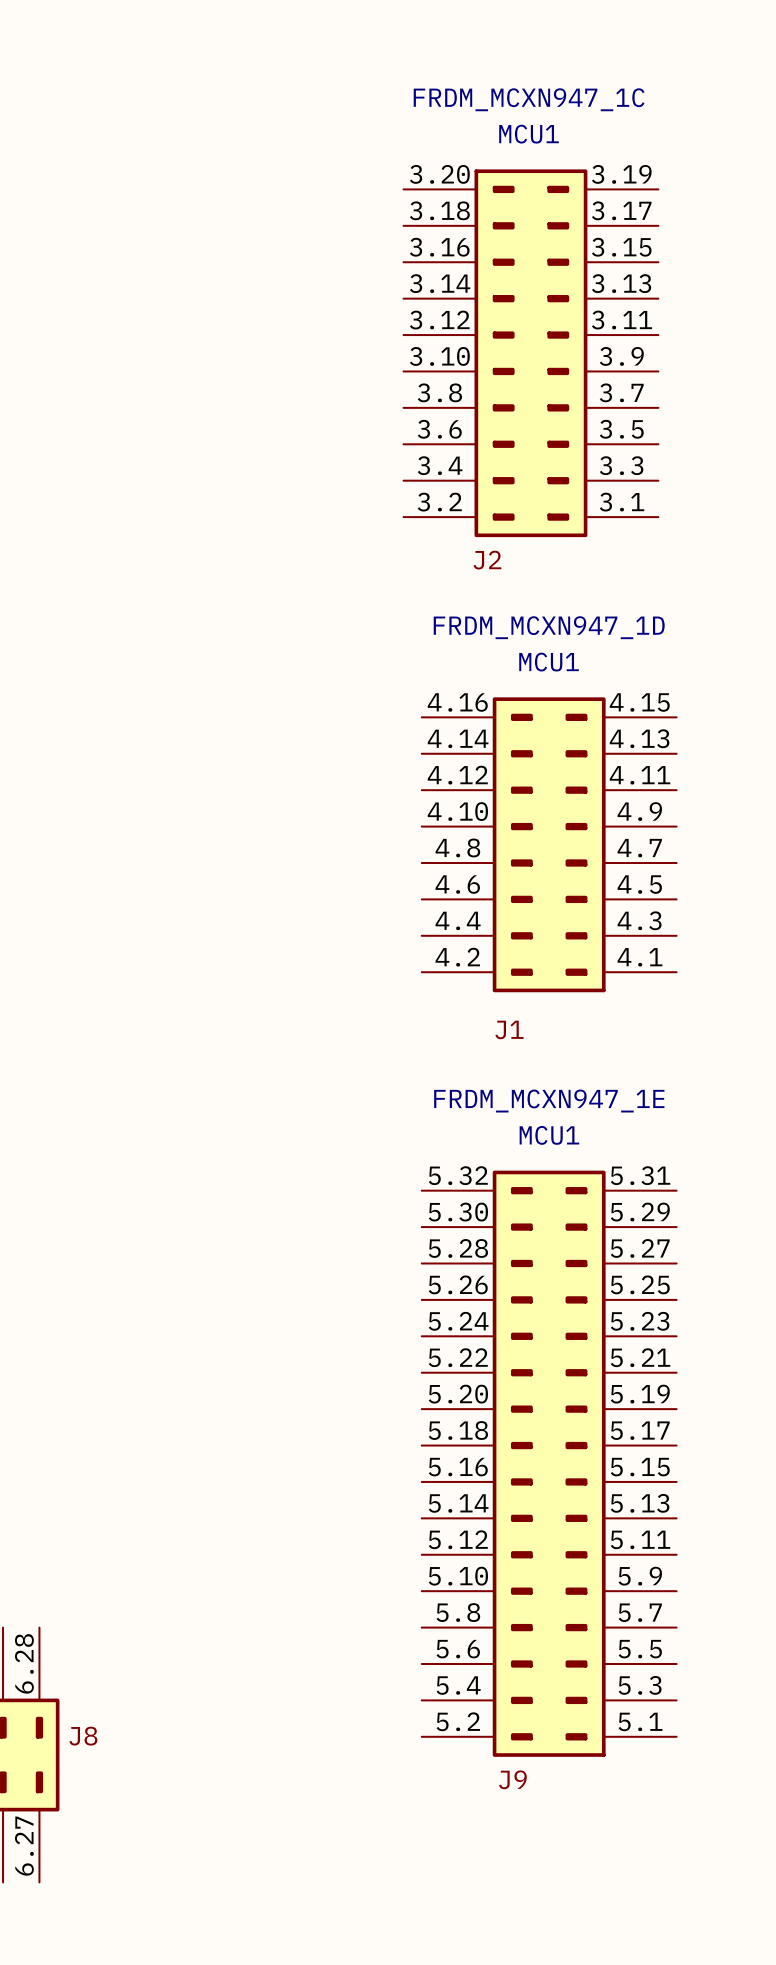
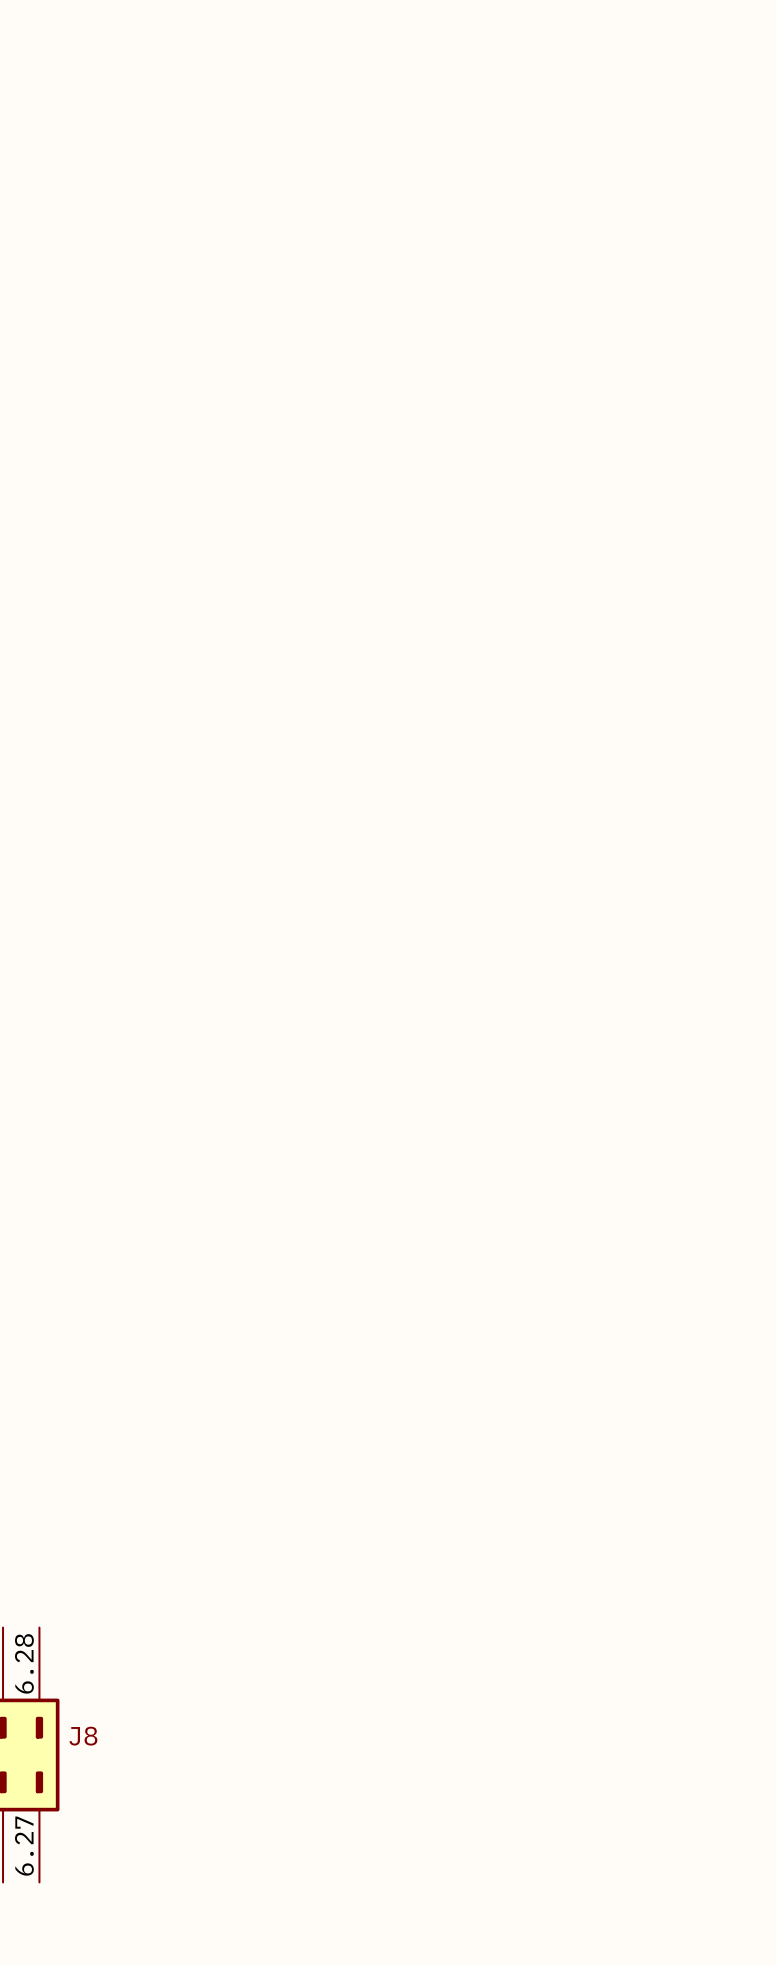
FRDM_MCXN947_1C: MCU1 (530, 353) -> none
FRDM_MCXN947_1D: MCU1 (549, 844) -> none
FRDM_MCXN947_1E: MCU1 (549, 1463) -> none

